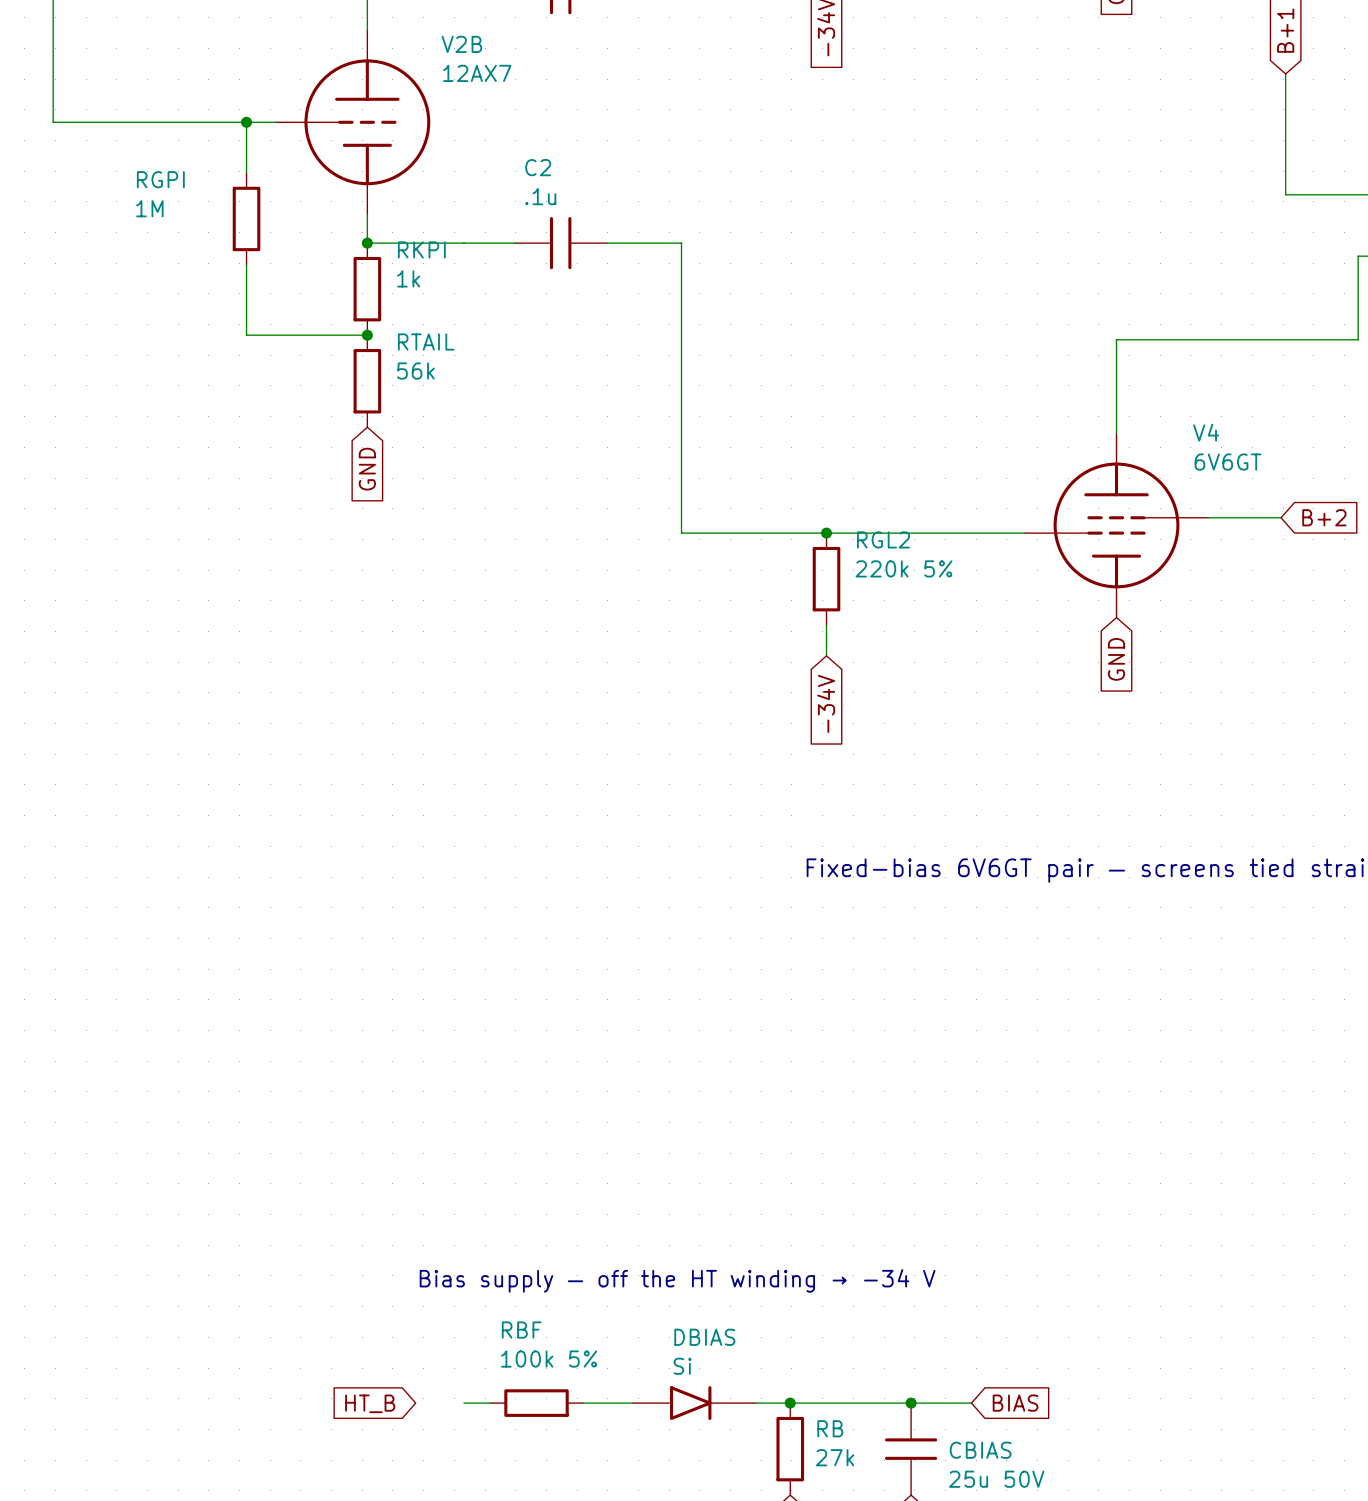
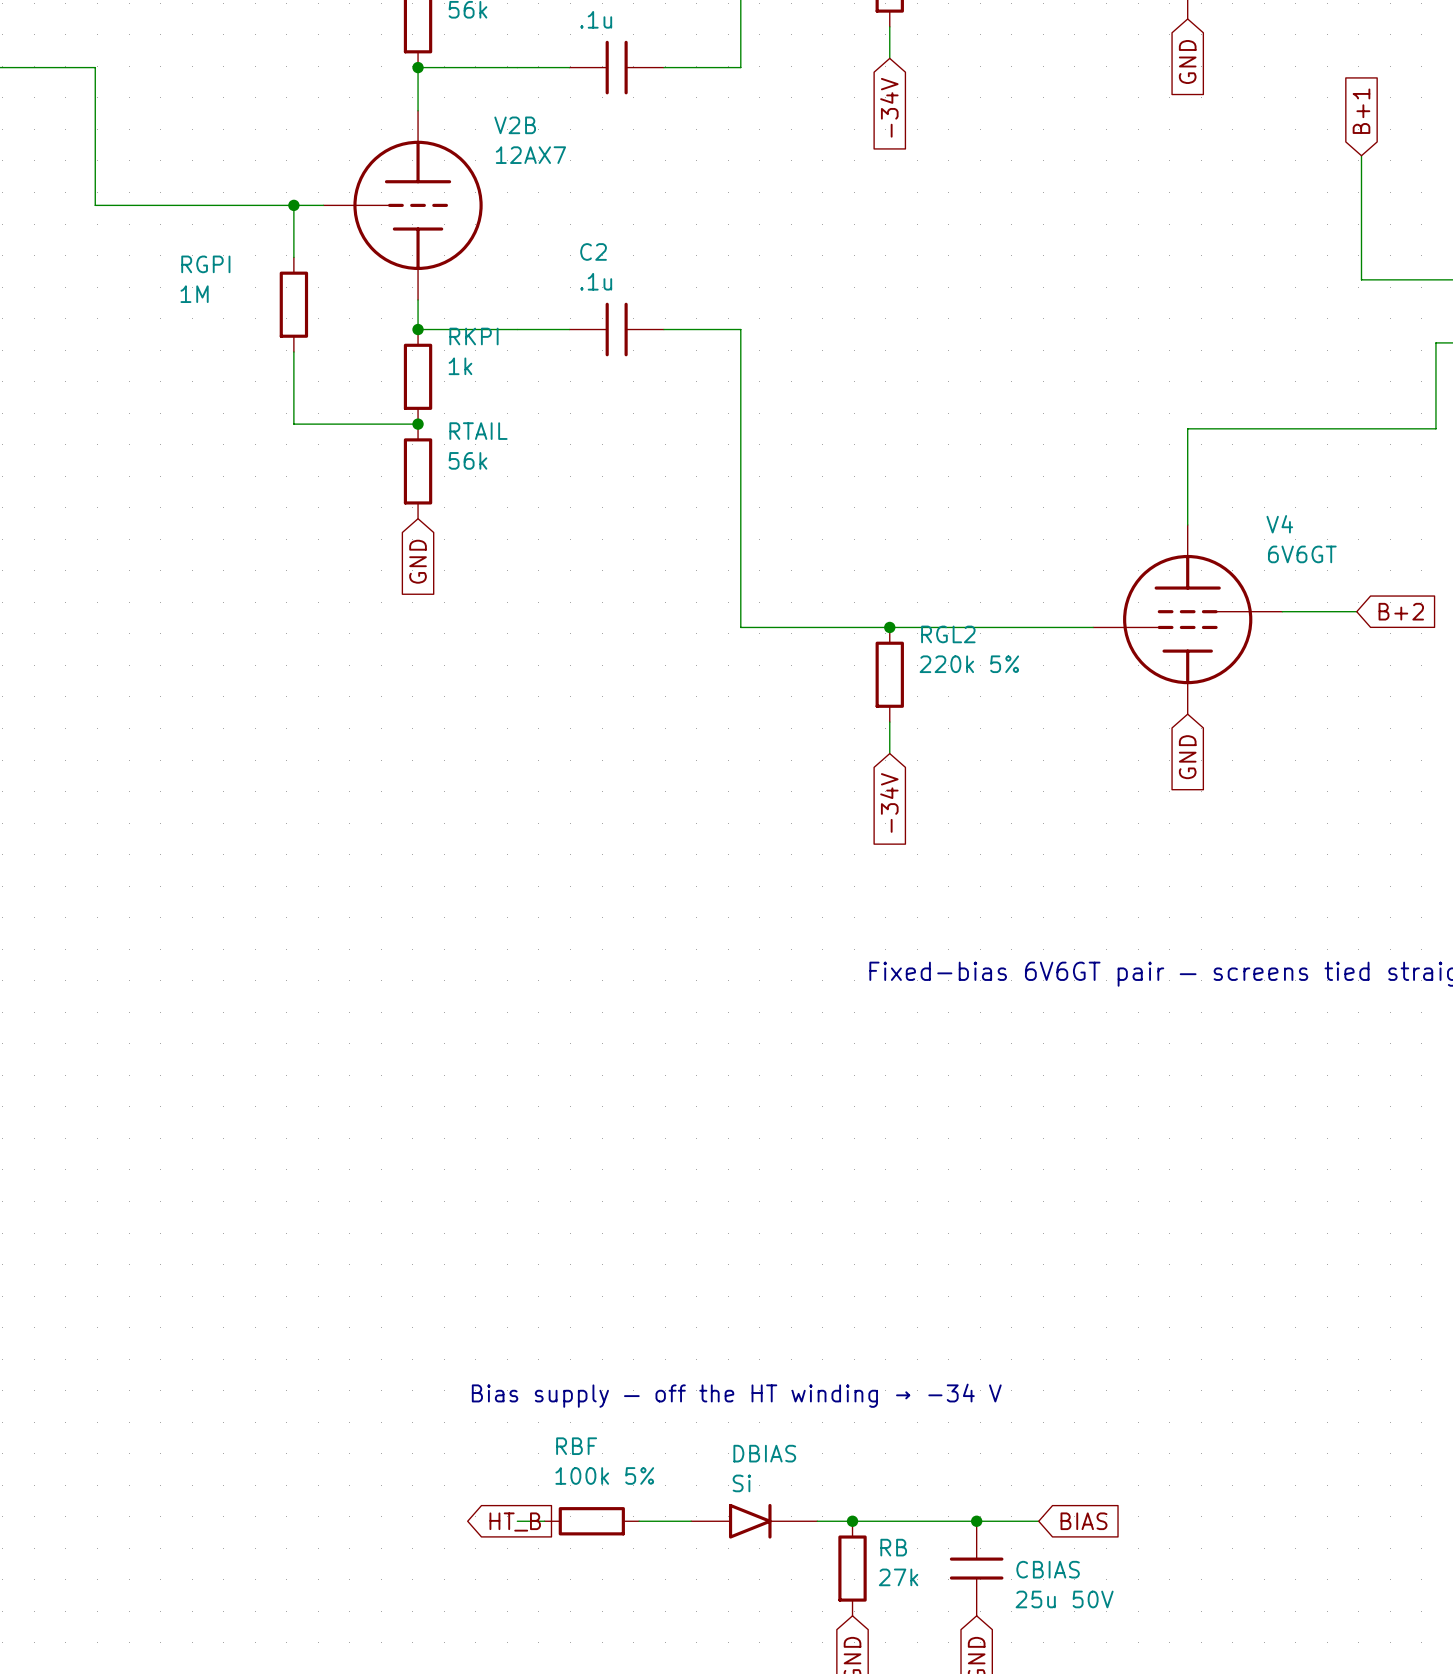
global label rotation: 0° (370, 1403) -> 180° (515, 1522)

